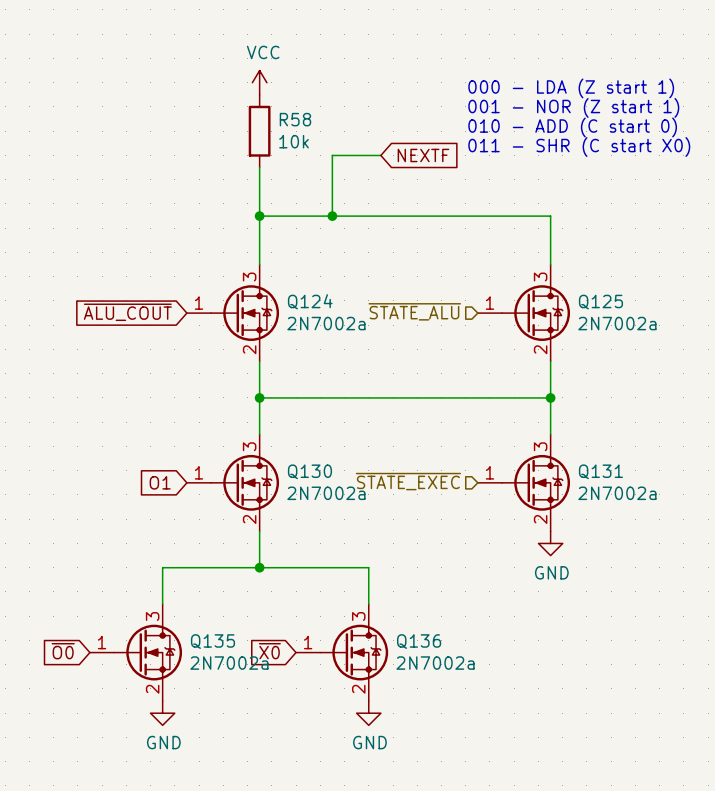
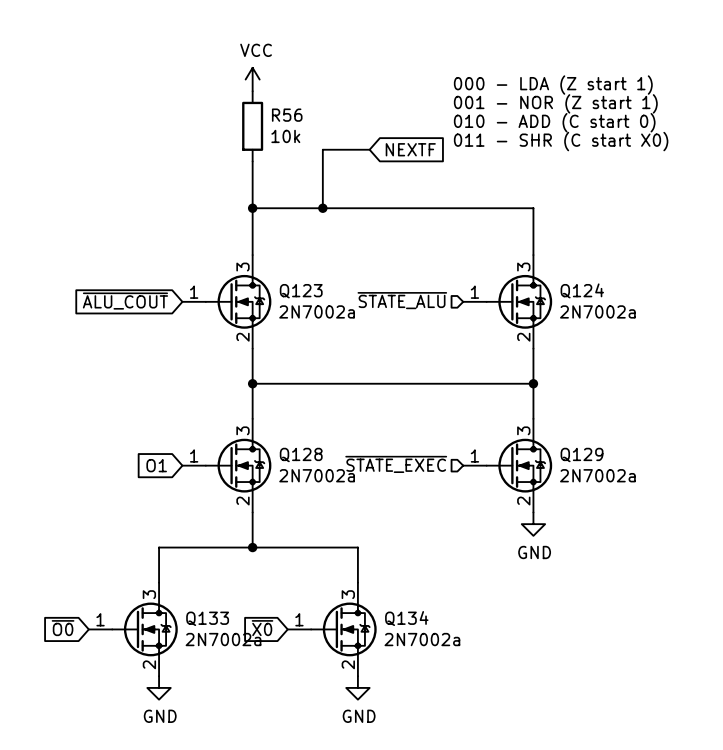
R58 name: R58 (295, 119) -> R56 (287, 115)
Q124 name: Q124 (310, 301) -> Q123 (301, 291)
Q125 name: Q125 (600, 302) -> Q124 (582, 290)
Q130 name: Q130 (309, 471) -> Q128 (301, 455)
Q131 name: Q131 (600, 471) -> Q129 (582, 455)
Q135 name: Q135 (212, 641) -> Q133 (207, 618)
Q136 name: Q136 (419, 641) -> Q134 (406, 618)

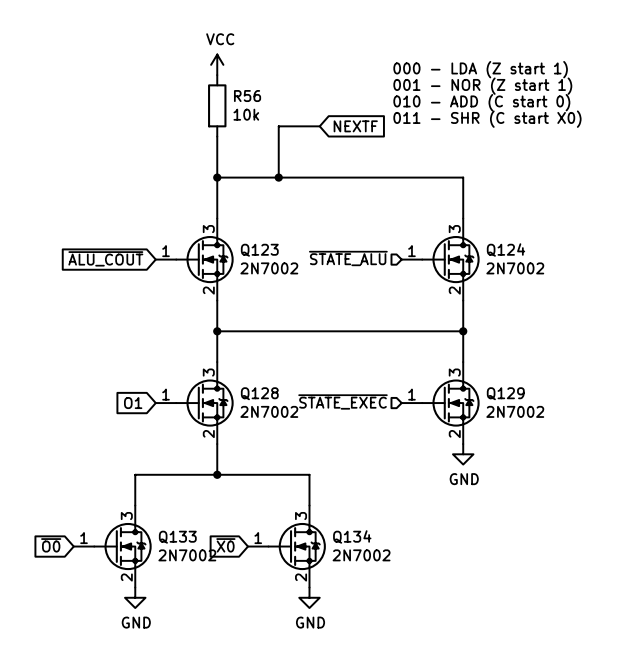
Q123 value: 2N7002a (317, 311) -> 2N7002 (269, 268)
Q124 value: 2N7002a (597, 311) -> 2N7002 (515, 268)
Q128 value: 2N7002a (317, 475) -> 2N7002 (269, 411)
Q129 value: 2N7002a (597, 475) -> 2N7002 (515, 411)
Q133 value: 2N7002a (223, 639) -> 2N7002 (187, 555)
Q134 value: 2N7002a (422, 639) -> 2N7002 (361, 555)

